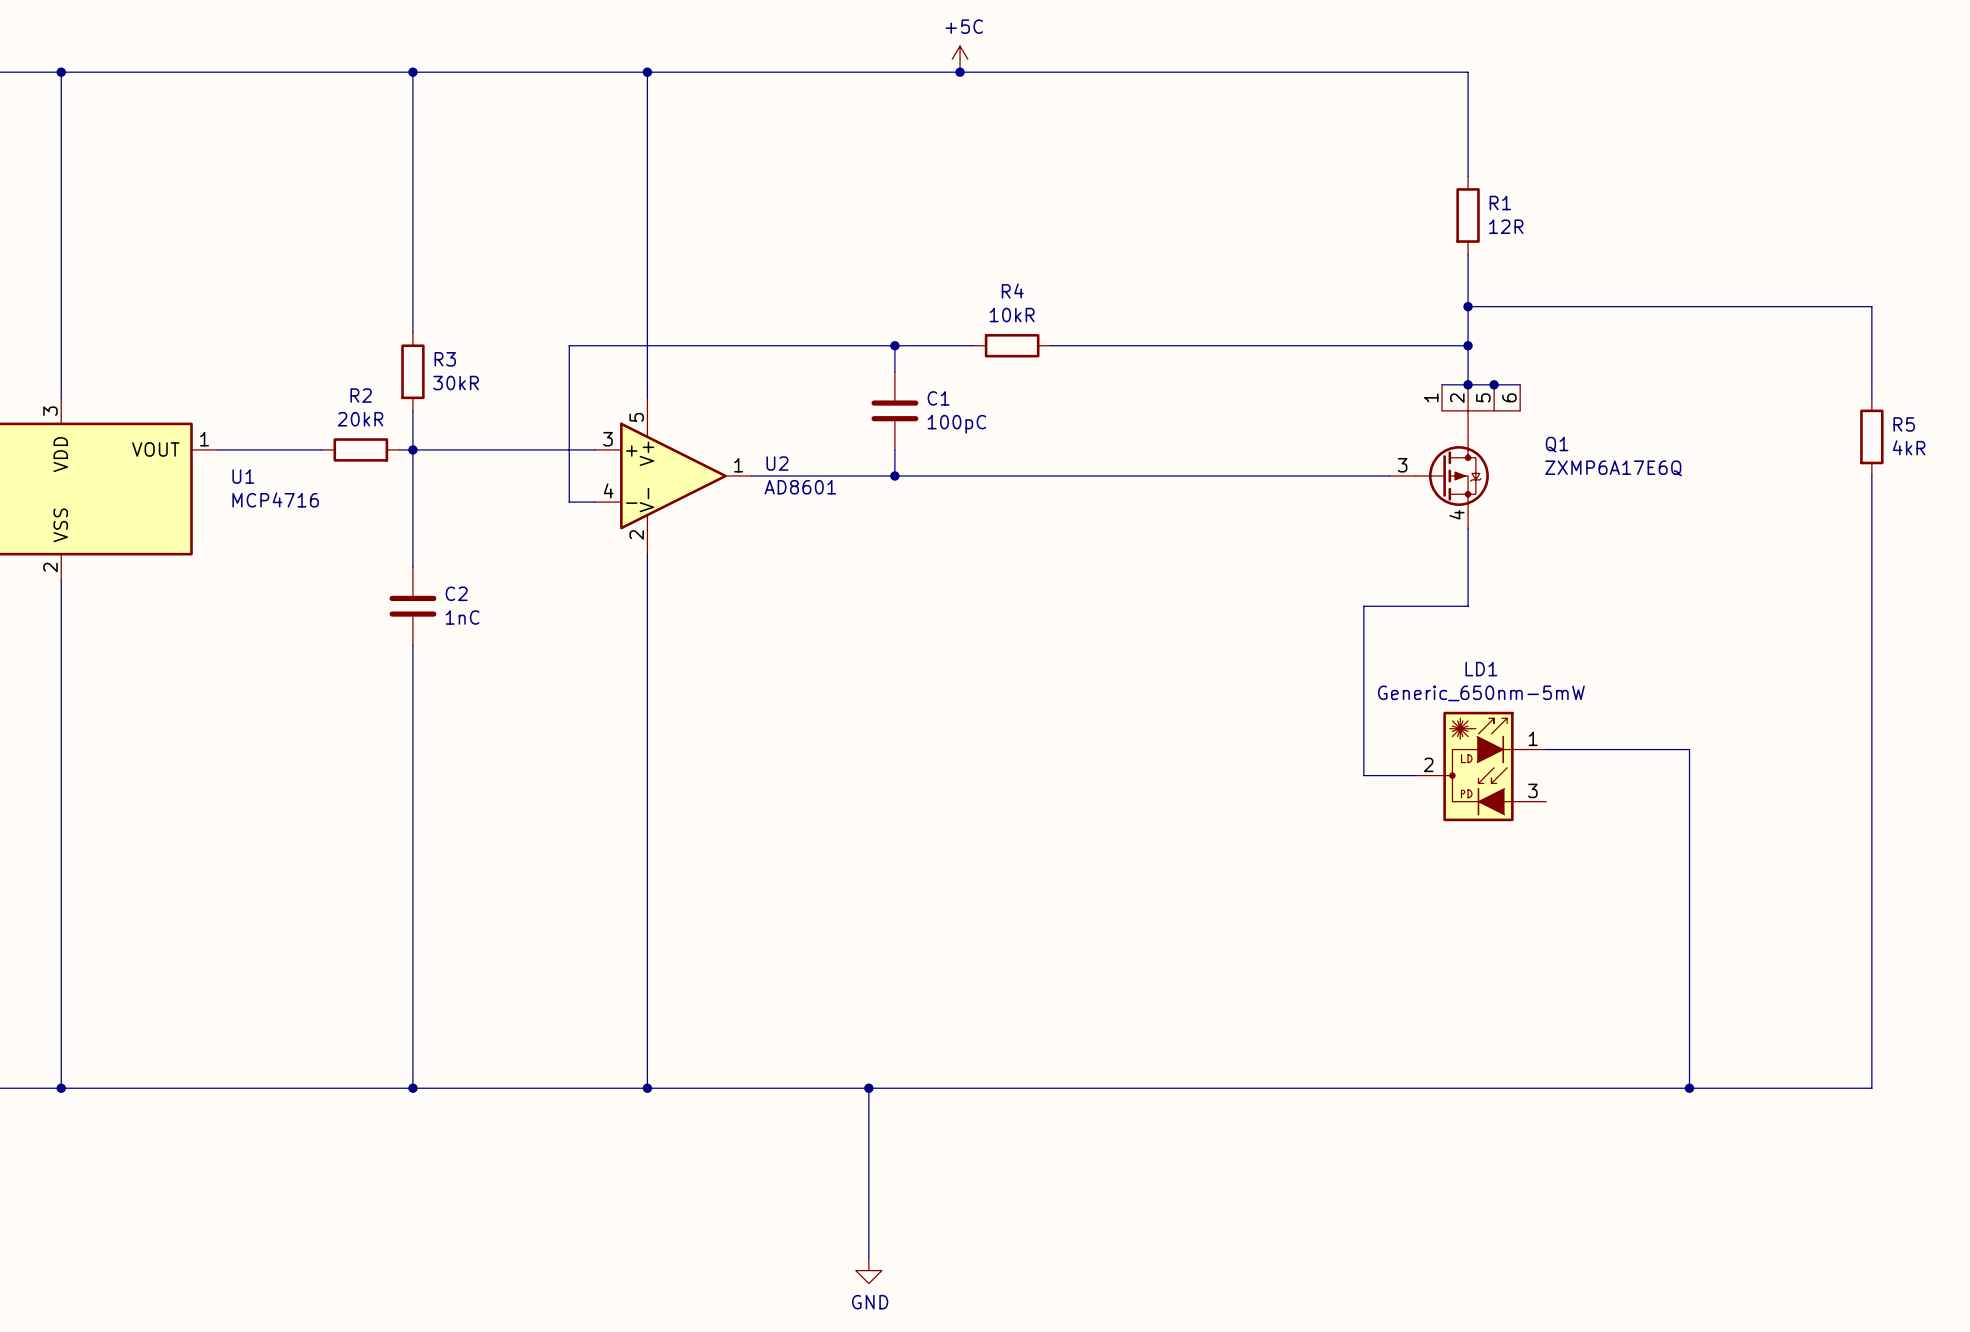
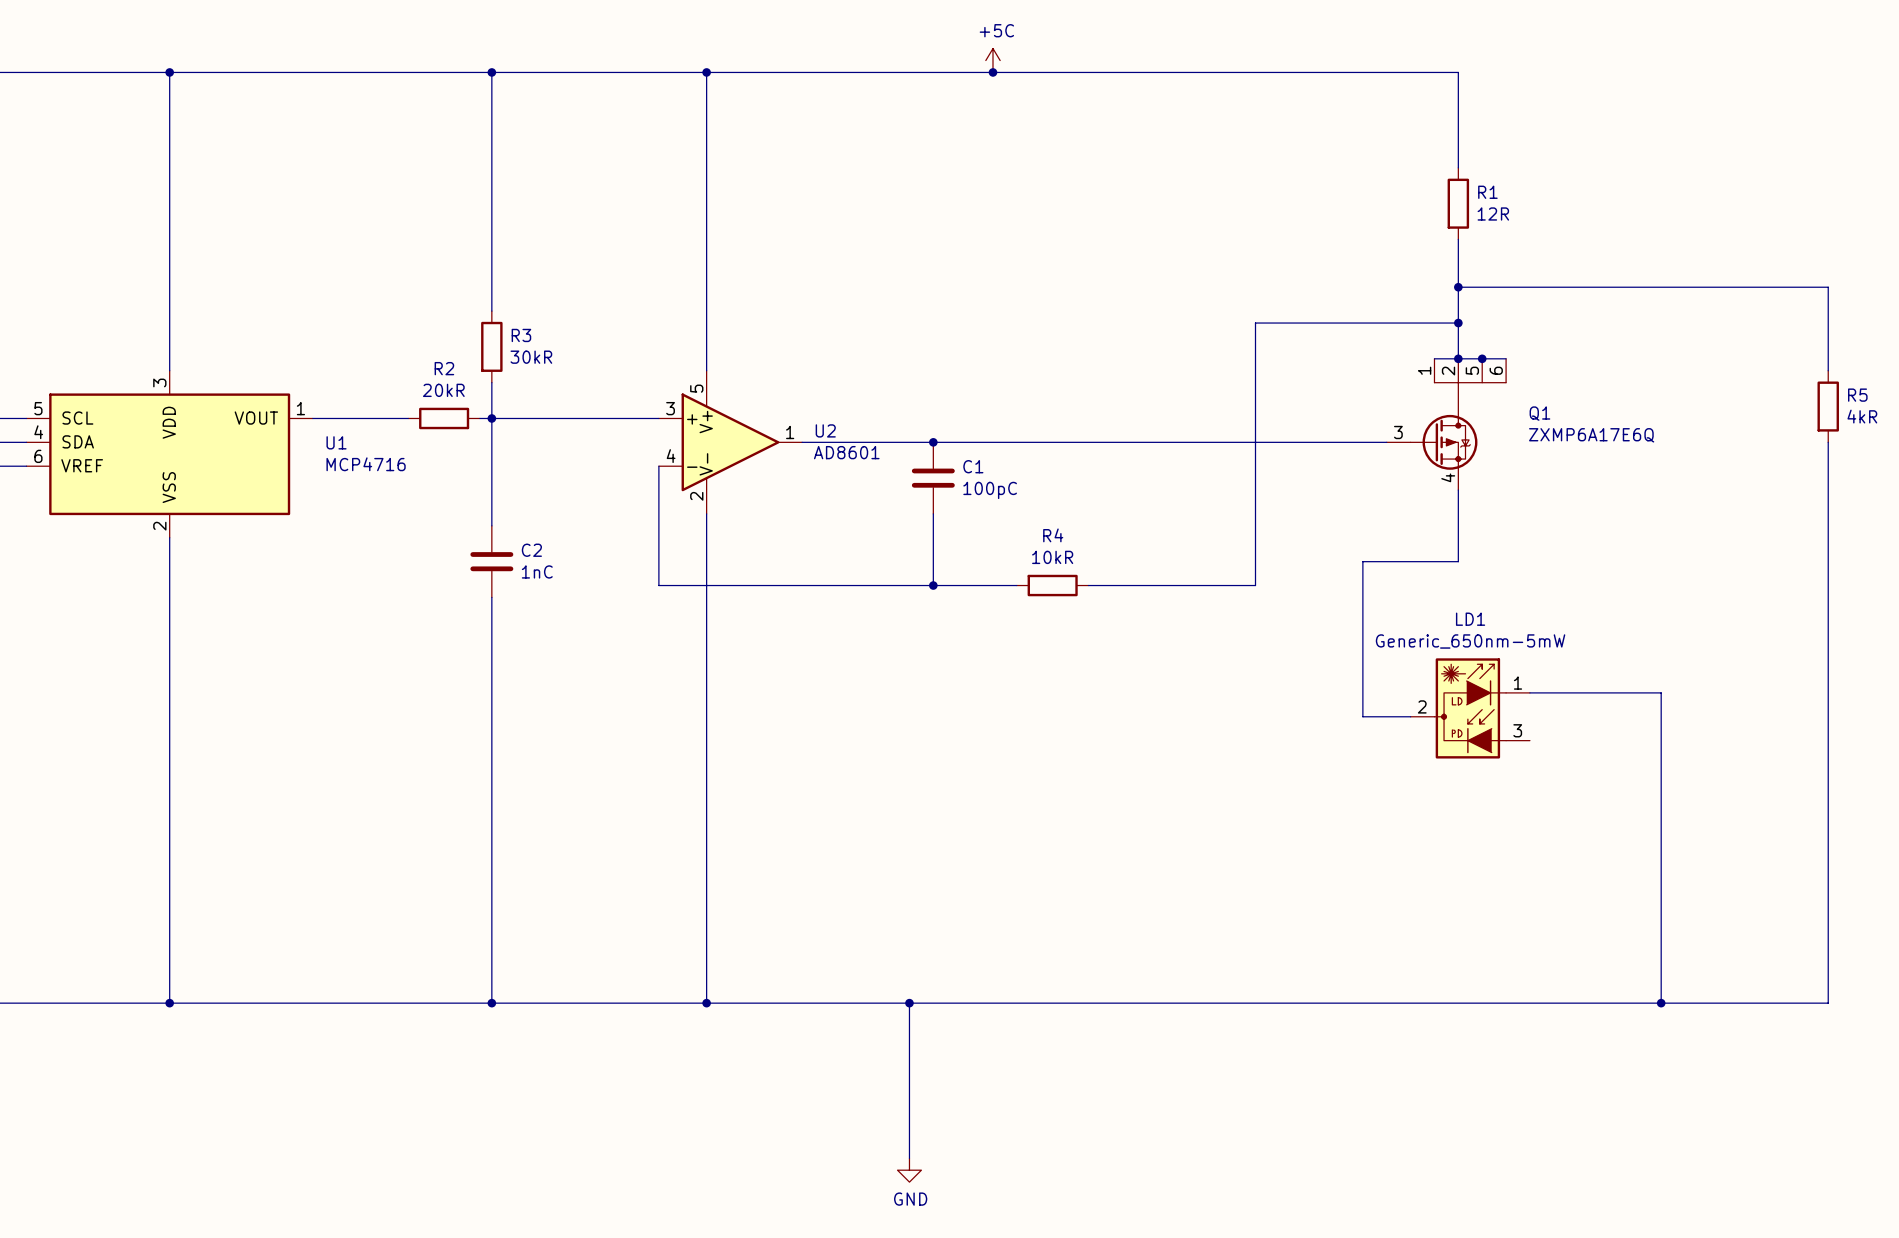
wire: (894, 345) (894, 371) -> none
junction: (894, 345) -> none
wire: (973, 345) (569, 345) (569, 502) (595, 502) -> (1016, 585) (658, 585) (658, 466)
R4 position: (1012, 345) -> (1052, 585)
wire: (1051, 345) (1246, 345) -> (1088, 585) (1255, 585) (1255, 323)
C1 position: (894, 410) -> (933, 478)
wire: (894, 449) (894, 476) -> none
wire: none -> (933, 513) (933, 585)
junction: none -> (933, 585)

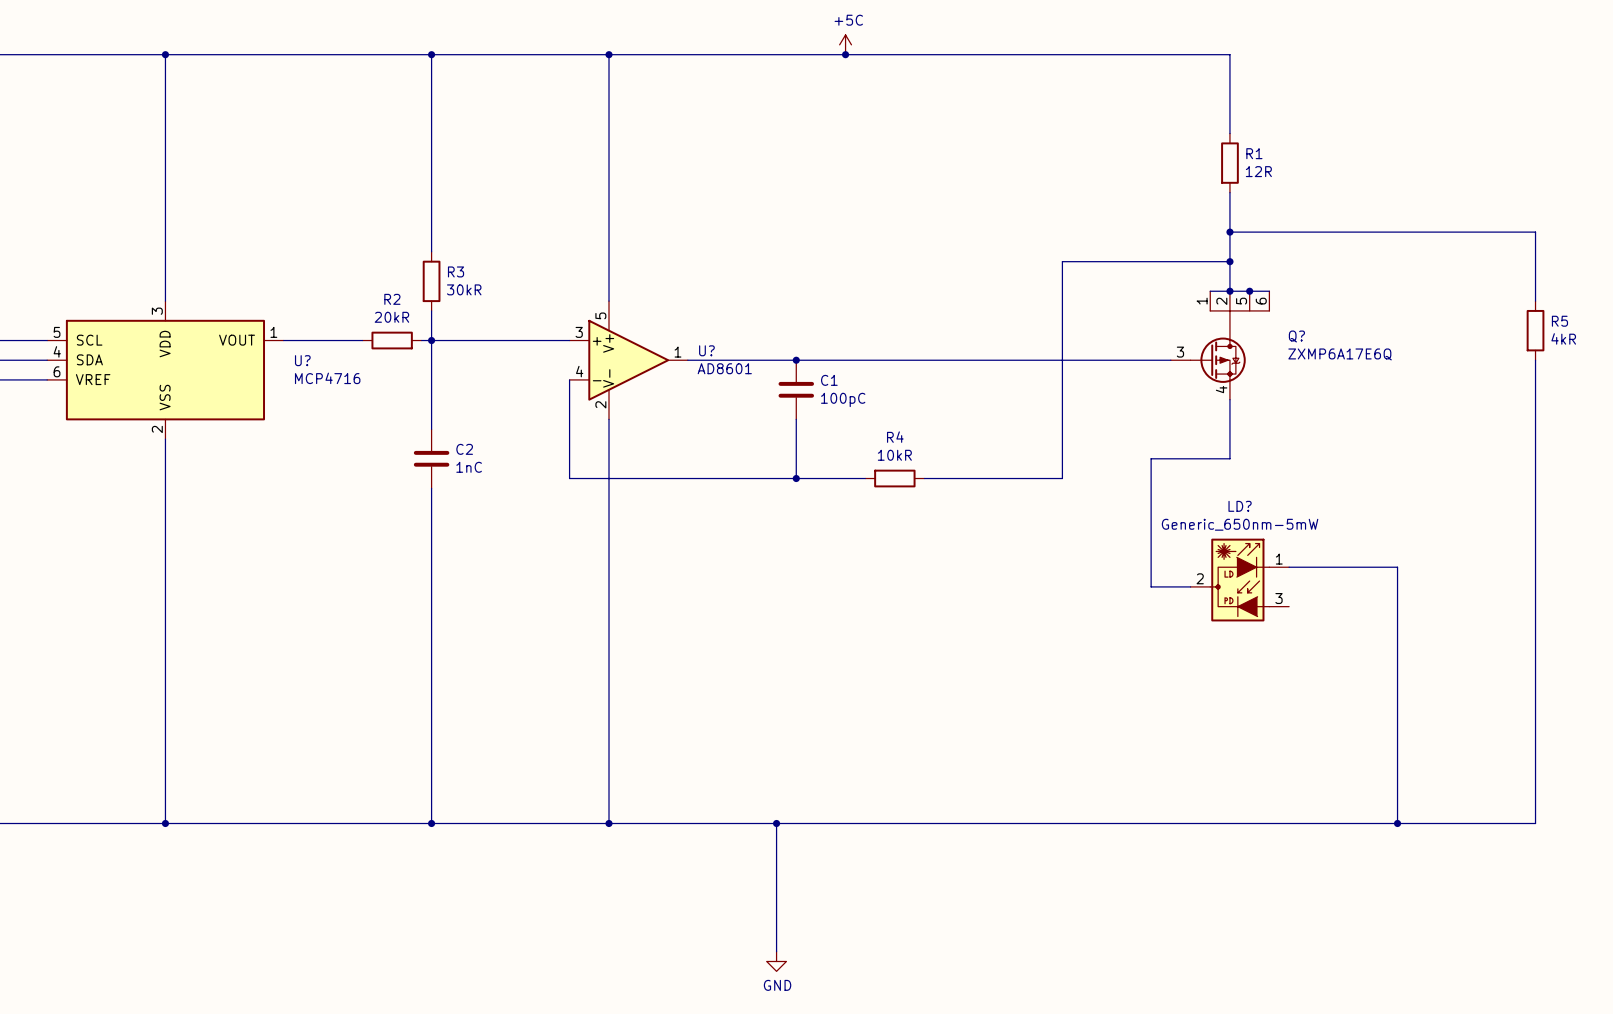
Q1 name: Q1 (1539, 413) -> Q? (1296, 336)
U2 name: U2 (825, 430) -> U? (706, 350)
U1 name: U1 (336, 442) -> U? (302, 360)
LD1 name: LD1 (1470, 619) -> LD? (1240, 506)

